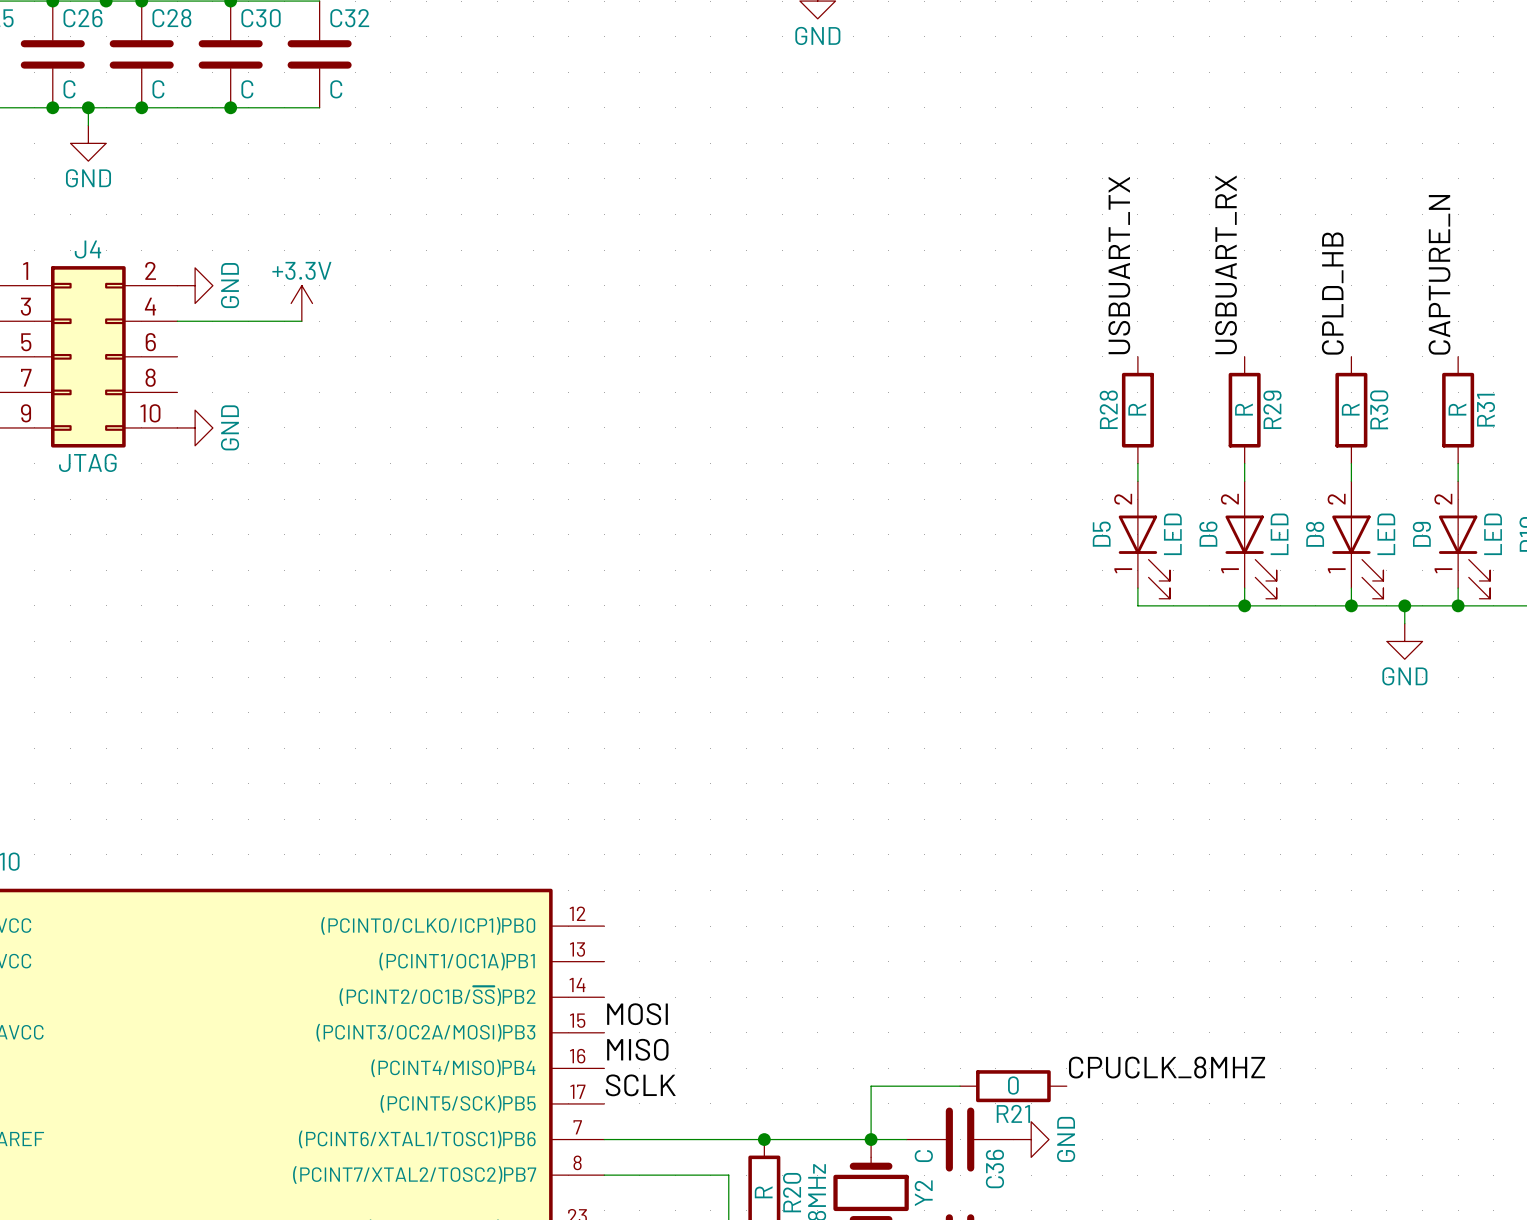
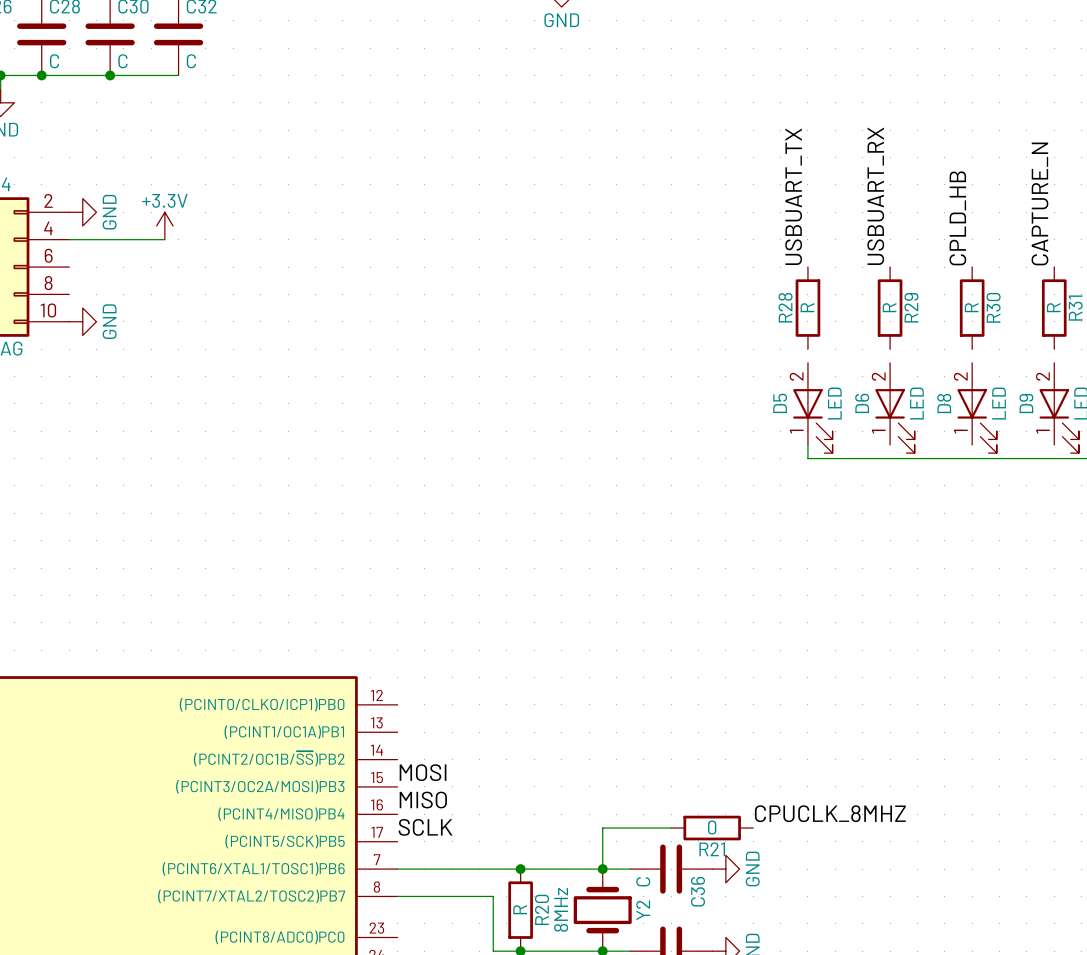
wire: (1137, 463) (1137, 481) -> none
wire: (1244, 463) (1244, 481) -> none
wire: (1351, 463) (1351, 481) -> none
wire: (1458, 463) (1458, 481) -> none
wire: (1244, 588) (1244, 605) -> none
wire: (1351, 588) (1351, 605) -> none
wire: (1458, 588) (1458, 605) -> none
junction: (1244, 605) -> none
junction: (1351, 605) -> none
wire: (1404, 605) (1404, 623) -> none
junction: (1404, 605) -> none
junction: (1458, 605) -> none
power symbol: GND (1404, 641) -> none

